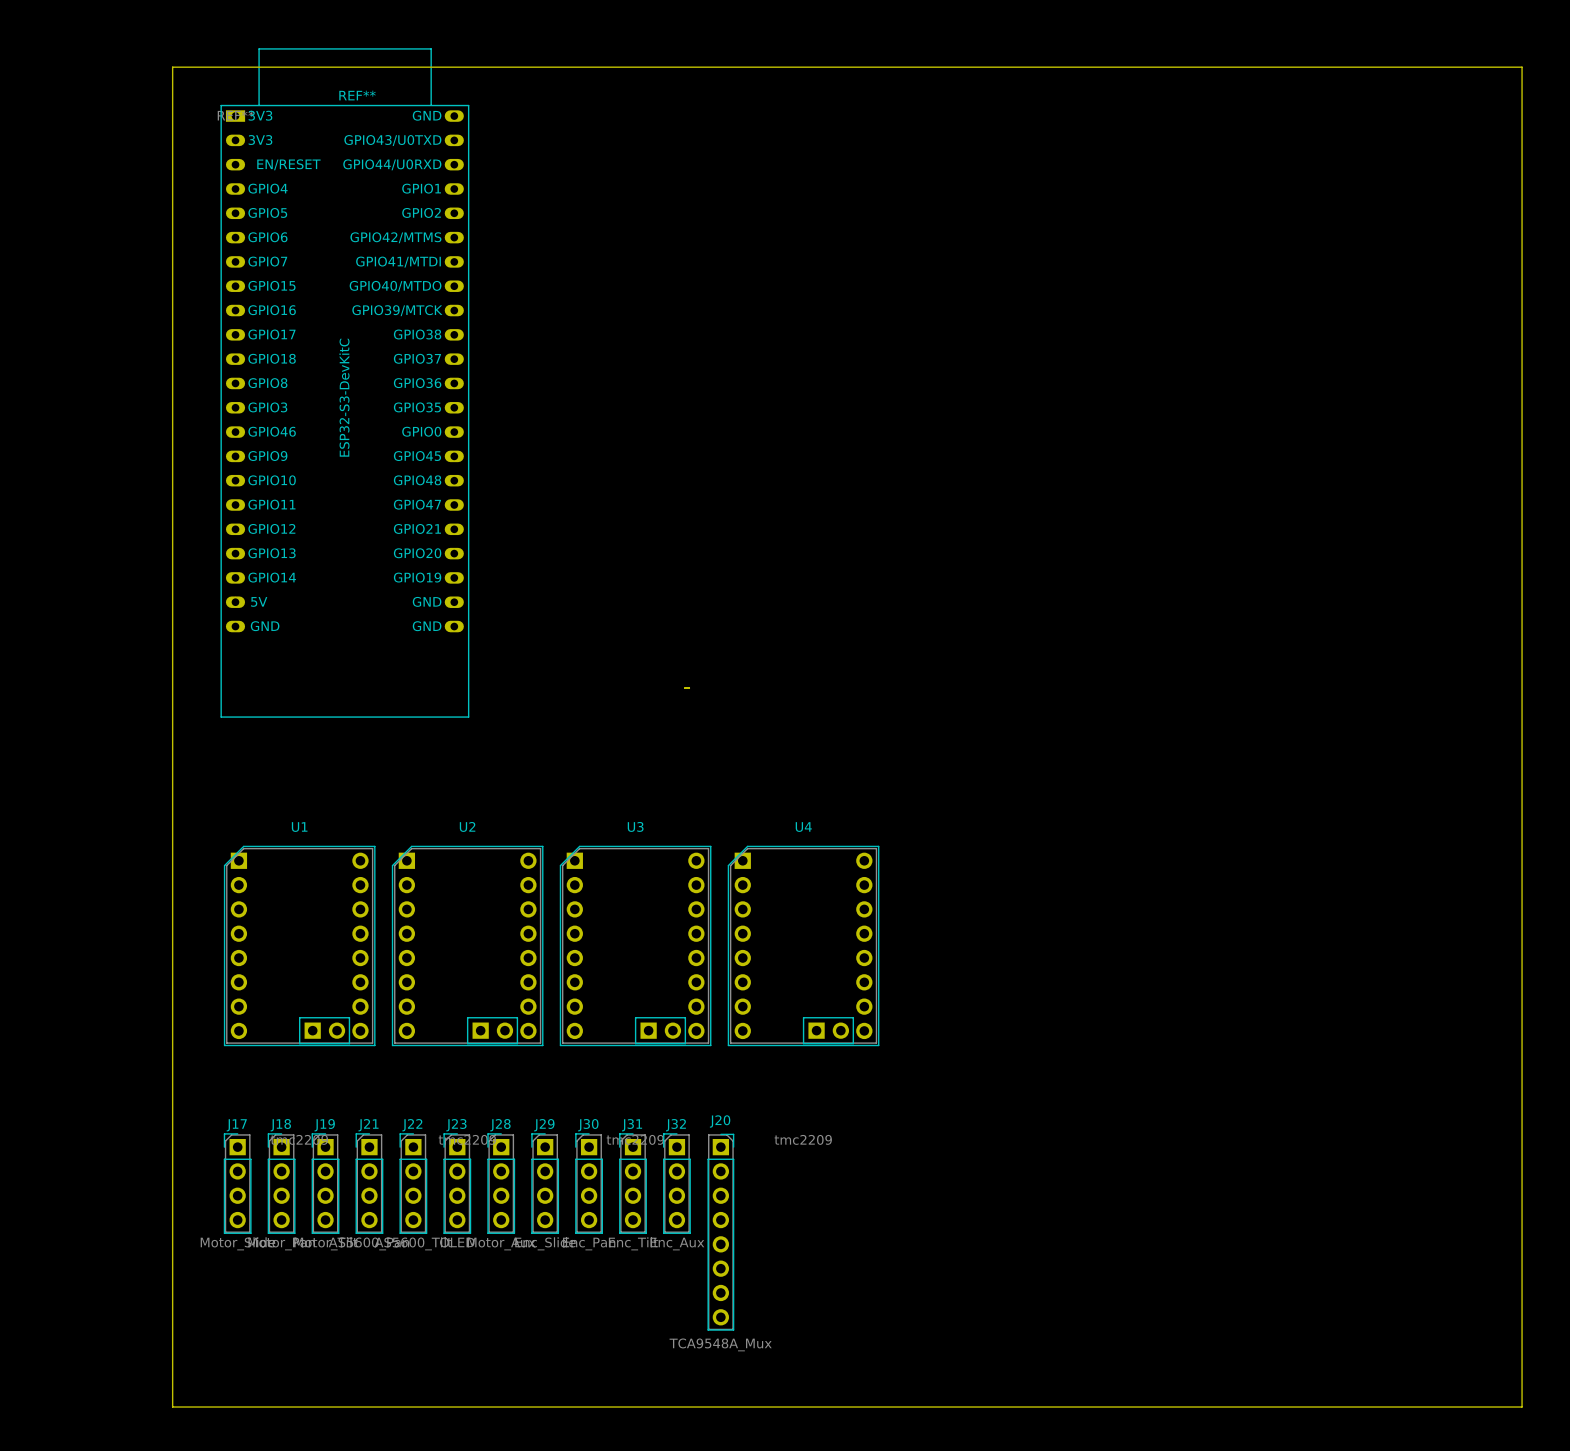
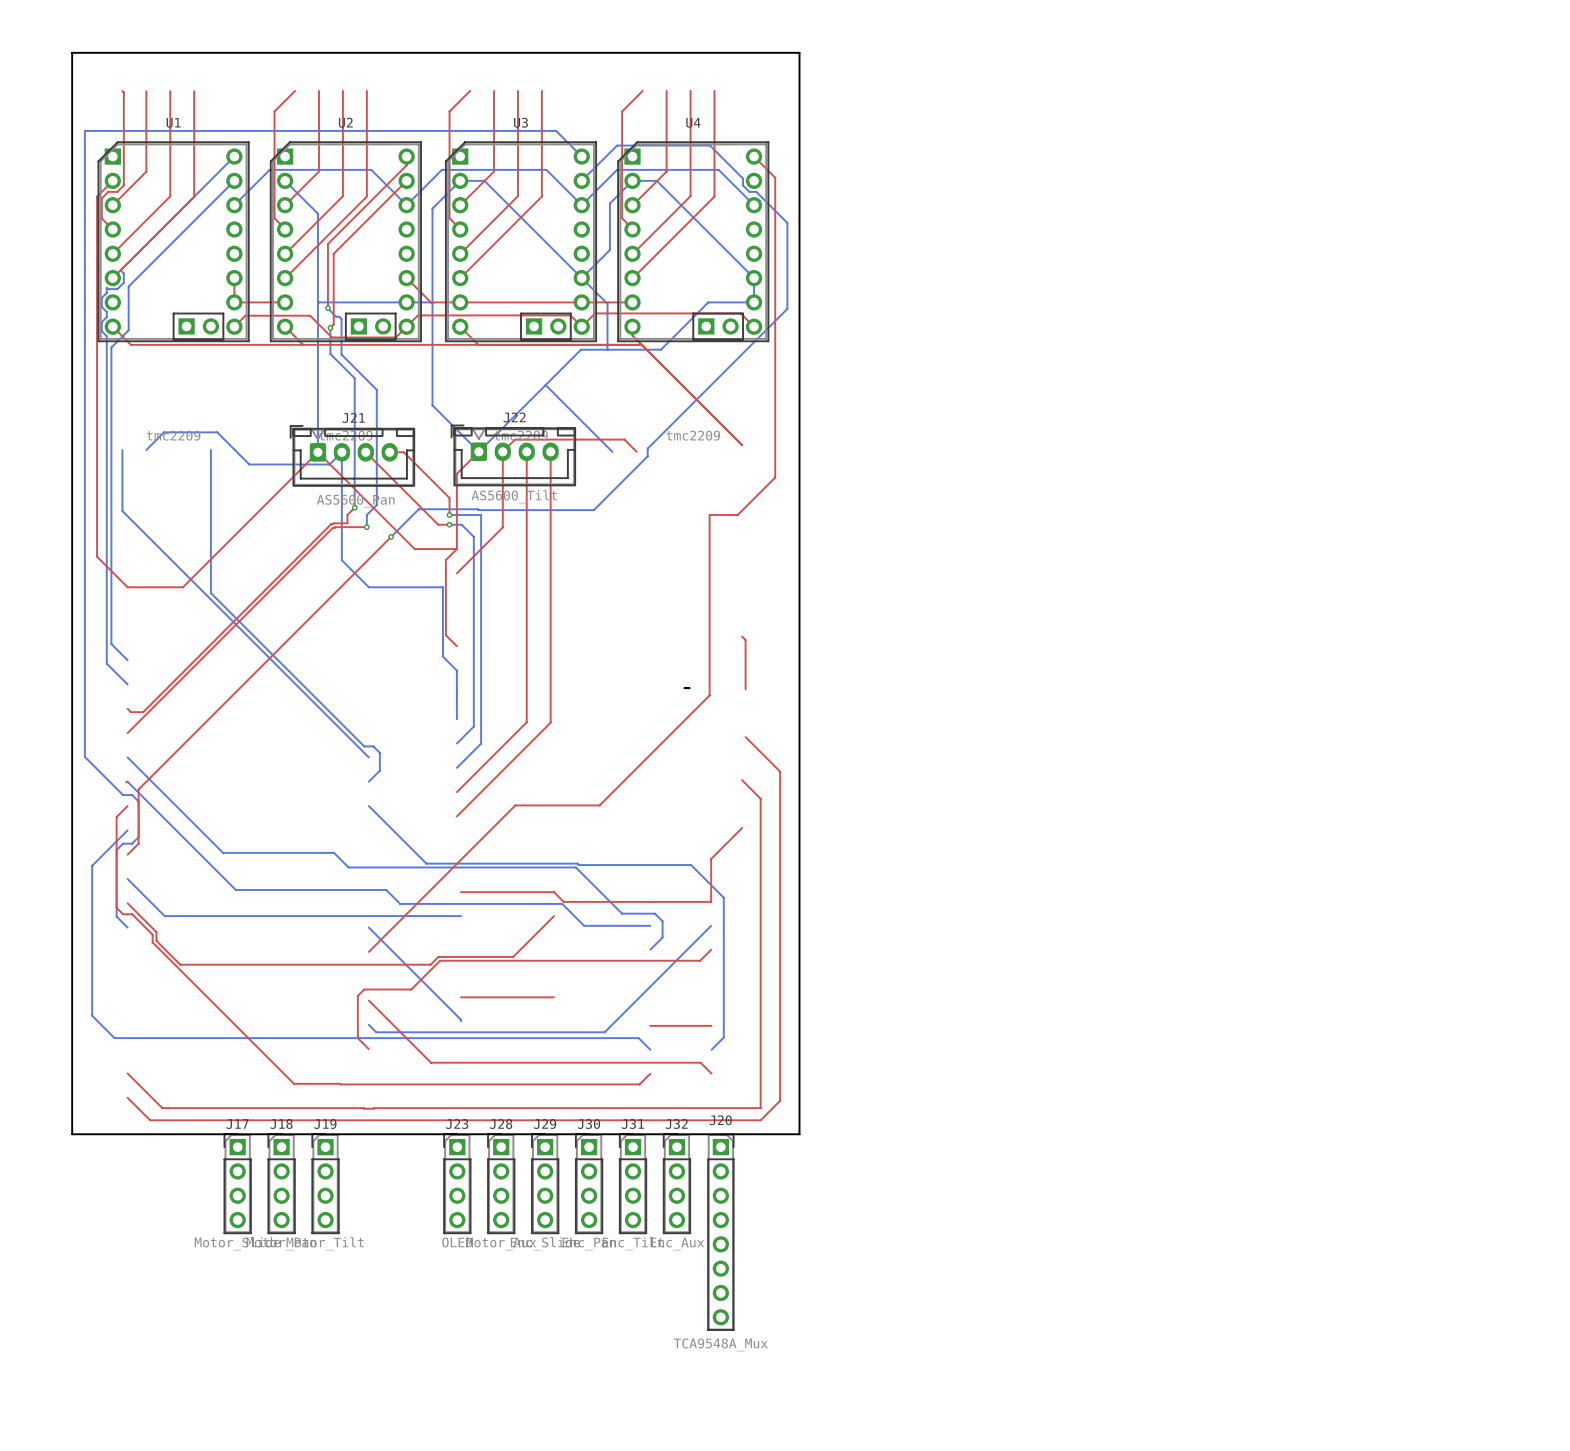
board edge: none -> (72, 52) (799, 52) (799, 1134) (72, 1134) (72, 52)
board edge: (172, 67) (1522, 67) (1522, 1407) (172, 1407) (172, 67) -> none
top track: none -> (295, 90) (274, 111) (274, 218) (285, 229)
top track: none -> (319, 90) (319, 171) (285, 204)
top track: none -> (342, 90) (342, 196) (285, 253)
top track: none -> (366, 90) (366, 196) (285, 277)
top track: none -> (470, 90) (449, 111) (449, 218) (460, 229)
top track: none -> (494, 90) (494, 171) (460, 204)
top track: none -> (517, 90) (517, 196) (460, 253)
top track: none -> (541, 90) (541, 196) (460, 277)
top track: none -> (642, 90) (622, 111) (622, 218) (633, 229)
top track: none -> (666, 90) (666, 171) (633, 204)
top track: none -> (690, 90) (690, 196) (633, 253)
top track: none -> (714, 90) (714, 196) (633, 277)
top track: none -> (122, 91) (123, 185) (117, 191) (108, 191) (101, 198) (101, 218) (112, 229)
top track: none -> (146, 91) (146, 171) (112, 205)
top track: none -> (170, 91) (170, 196) (112, 253)
top track: none -> (194, 91) (194, 196) (112, 278)
bottom track: none -> (234, 156) (120, 270) (123, 273) (123, 282) (117, 289) (106, 287) (106, 292) (101, 297) (101, 306) (106, 311) (106, 317) (101, 322) (101, 331) (106, 336) (106, 663) (127, 684)
top track: none -> (406, 156) (406, 165) (327, 243) (327, 308)
bottom track: none -> (581, 156) (556, 130) (84, 130) (84, 756) (123, 795) (132, 795) (138, 801) (138, 837) (132, 843) (123, 843) (116, 850) (116, 916) (127, 927)
top track: none -> (754, 156) (775, 177) (775, 477) (737, 515) (709, 515) (709, 695) (599, 805) (515, 805) (368, 951)
top track: none -> (112, 180) (97, 196) (97, 556) (127, 587) (182, 587) (317, 452) (414, 549) (456, 549)
bottom track: none -> (234, 180) (128, 286) (128, 330) (111, 347) (111, 643) (127, 660)
bottom track: none -> (285, 180) (317, 213) (317, 452)
top track: none -> (406, 180) (333, 253) (333, 324) (330, 327)
bottom track: none -> (581, 180) (617, 145) (709, 145) (743, 178) (743, 185) (749, 191) (756, 191) (787, 222) (787, 308) (647, 448) (647, 456) (593, 510) (418, 509) (391, 536)
bottom track: none -> (234, 205) (269, 169) (371, 169) (406, 205) (441, 169) (546, 169) (581, 205) (617, 169) (718, 169) (754, 205)
top track: none -> (234, 278) (234, 302) (285, 302)
top track: none -> (406, 278) (430, 302) (632, 302)
bottom track: none -> (581, 278) (609, 249) (609, 203) (632, 180) (656, 180) (754, 278) (754, 302) (708, 302) (660, 349) (580, 349) (478, 451) (432, 405) (432, 208) (460, 180) (484, 180) (607, 303) (607, 349)
bottom track: none -> (317, 303) (432, 303)
bottom track: none -> (327, 308) (336, 316) (341, 318) (341, 354) (376, 389) (376, 505) (366, 515) (366, 527)
via: none -> (327, 308)
top track: none -> (112, 326) (130, 344) (641, 344)
top track: none -> (234, 326) (245, 315) (310, 315) (331, 337) (395, 337) (417, 315) (570, 315) (581, 326) (595, 313) (740, 313) (754, 326)
top track: none -> (285, 326) (303, 344)
top track: none -> (460, 326) (478, 344)
top track: none -> (632, 326) (632, 335) (742, 445)
bottom track: none -> (330, 327) (330, 354) (354, 378) (354, 507)
via: none -> (330, 327)
REF**: ESP32-S3-DevKitC (344, 383) -> none
bottom track: none -> (545, 385) (612, 451)
bottom track: none -> (122, 449) (122, 511) (368, 757)
bottom track: none -> (146, 449) (163, 432) (217, 432) (249, 464) (329, 464) (341, 452) (341, 560) (368, 587) (442, 587) (442, 656) (456, 670) (456, 719)
bottom track: none -> (210, 449) (210, 593) (364, 746) (373, 746) (379, 752) (379, 770) (368, 781)
top track: none -> (478, 451) (456, 473) (456, 549)
top track: none -> (526, 451) (526, 722) (456, 792)
top track: none -> (550, 451) (550, 722) (456, 816)
top track: none -> (636, 451) (624, 439) (515, 439) (502, 451) (502, 527) (456, 573)
top track: none -> (365, 452) (438, 524) (449, 524)
top track: none -> (389, 452) (403, 452) (449, 497) (449, 515)
top track: none -> (354, 507) (347, 515) (347, 523) (331, 524) (143, 712) (130, 712) (127, 708)
via: none -> (354, 507)
bottom track: none -> (449, 515) (481, 515) (481, 743) (456, 767)
via: none -> (449, 515)
bottom track: none -> (449, 524) (461, 524) (473, 536) (473, 726) (456, 743)
via: none -> (449, 524)
top track: none -> (366, 527) (332, 527) (127, 733)
via: none -> (366, 527)
top track: none -> (391, 536) (138, 789) (138, 843) (127, 854)
via: none -> (391, 536)
top track: none -> (456, 549) (445, 560) (445, 635) (456, 646)
top track: none -> (742, 636) (745, 640) (745, 689)
top track: none -> (745, 737) (780, 771) (780, 1100) (760, 1120) (150, 1120) (127, 1097)
bottom track: none -> (127, 757) (223, 852) (334, 852) (348, 867) (575, 867) (622, 913) (654, 913) (662, 921) (662, 937) (650, 949)
top track: none -> (742, 780) (760, 798) (760, 1108) (162, 1108) (127, 1073)
top track: none -> (127, 781) (126, 782)
bottom track: none -> (127, 781) (235, 889) (386, 889) (400, 903) (562, 903) (584, 925) (650, 925)
top track: none -> (127, 806) (116, 817) (116, 907) (123, 914) (132, 914) (152, 934) (152, 942) (294, 1083) (639, 1084) (650, 1073)
bottom track: none -> (368, 806) (426, 863) (691, 865) (723, 897) (723, 1037) (711, 1049)
top track: none -> (742, 828) (711, 858) (711, 901) (563, 901) (554, 892) (460, 892)
bottom track: none -> (127, 830) (92, 865) (92, 1015) (114, 1038) (638, 1038) (650, 1049)
bottom track: none -> (127, 878) (164, 916) (460, 916)
top track: none -> (127, 903) (156, 932) (156, 940) (180, 964) (430, 964) (438, 956) (513, 956) (554, 916)
bottom track: none -> (711, 925) (604, 1032) (376, 1032) (368, 1024)
bottom track: none -> (368, 927) (460, 1021)
U1 position: (299, 945) -> (173, 241)
U2 position: (467, 945) -> (345, 241)
U3 position: (635, 945) -> (521, 241)
U4 position: (803, 945) -> (693, 241)
top track: none -> (711, 949) (700, 960) (440, 960) (411, 989) (364, 989) (357, 995) (357, 1038) (368, 1049)
top track: none -> (460, 997) (554, 997)
top track: none -> (368, 1000) (431, 1062) (700, 1062) (711, 1073)
top track: none -> (650, 1025) (711, 1025)
J21 name position: J21 (368, 1125) -> J21 (353, 417)
J22 name position: J22 (412, 1125) -> J22 (514, 417)
J21 footprint: [355, 1133, 384, 1234] -> [290, 425, 415, 487]
J22 footprint: [399, 1133, 428, 1234] -> [451, 424, 576, 486]

